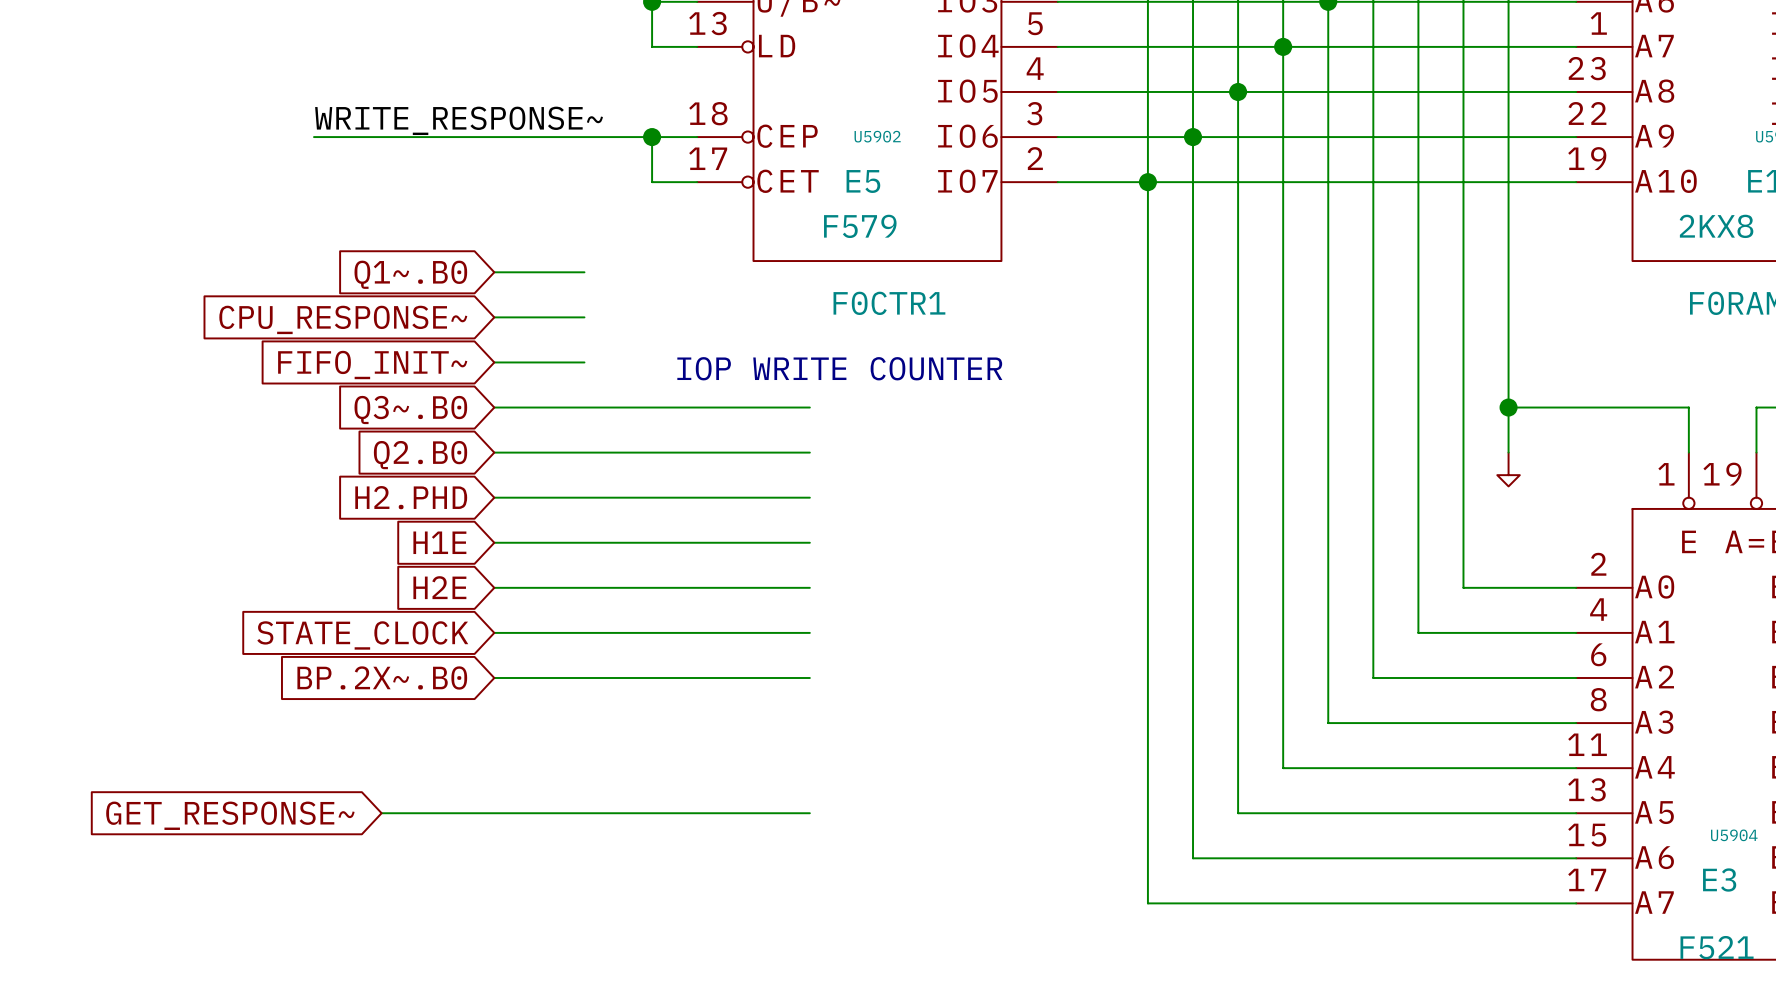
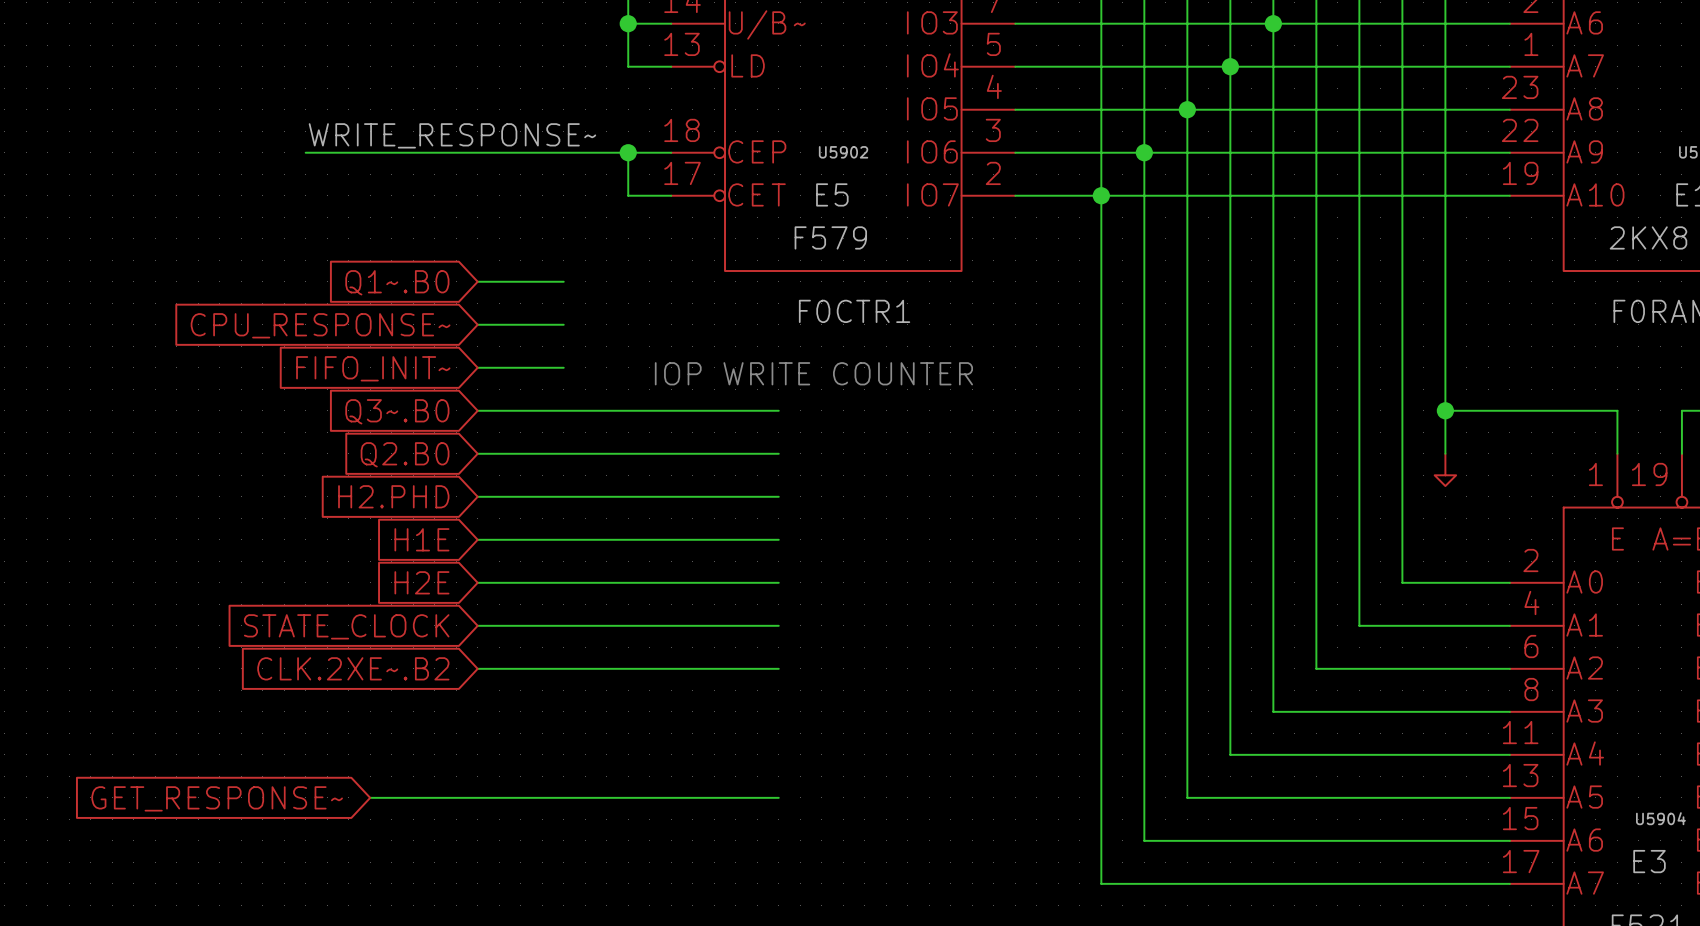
global label: BP.2X~.B0 (382, 677) -> CLK.2XE~.B2 (353, 668)

